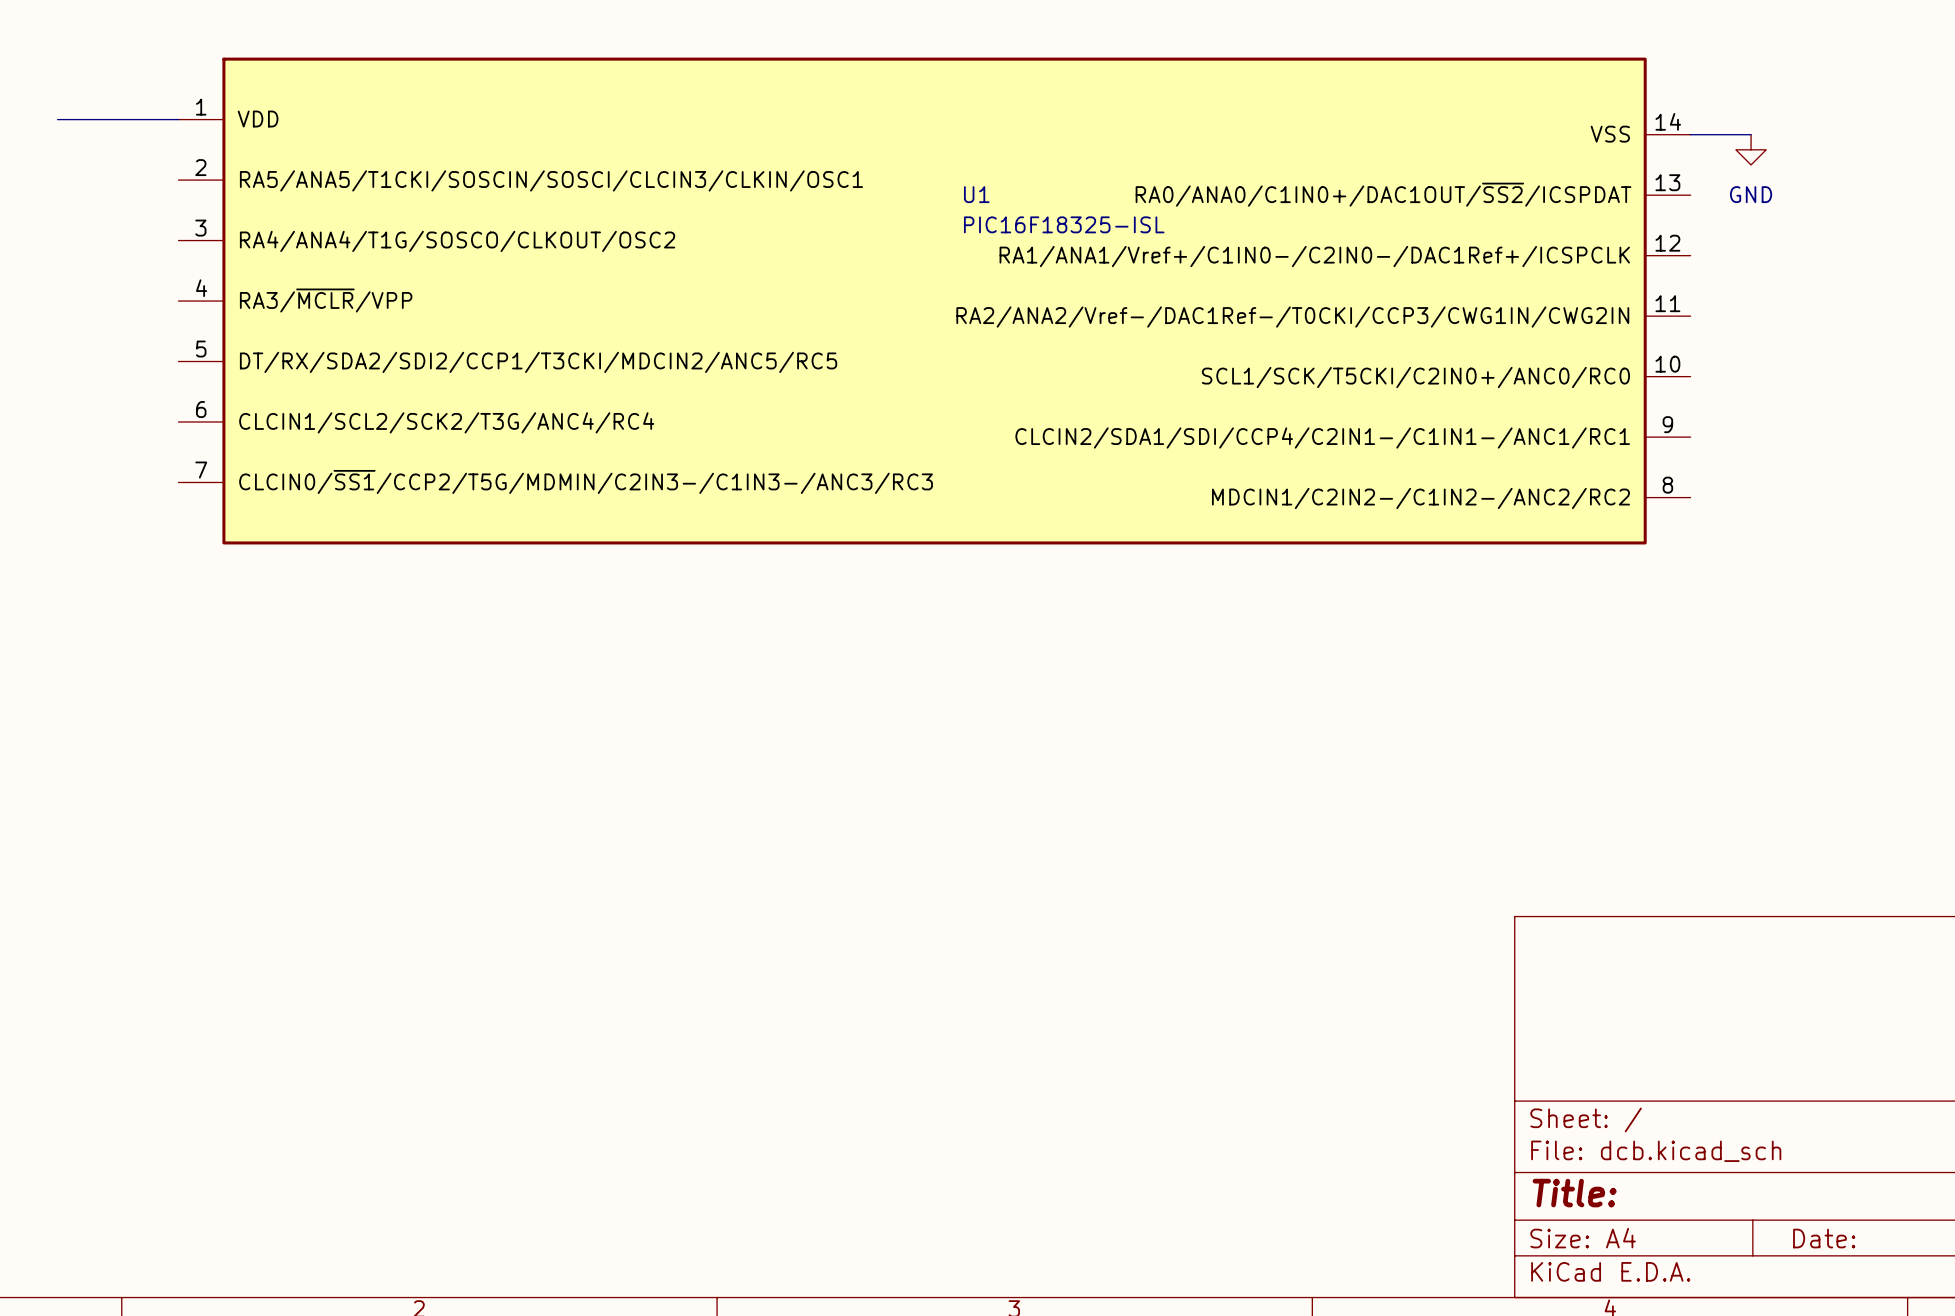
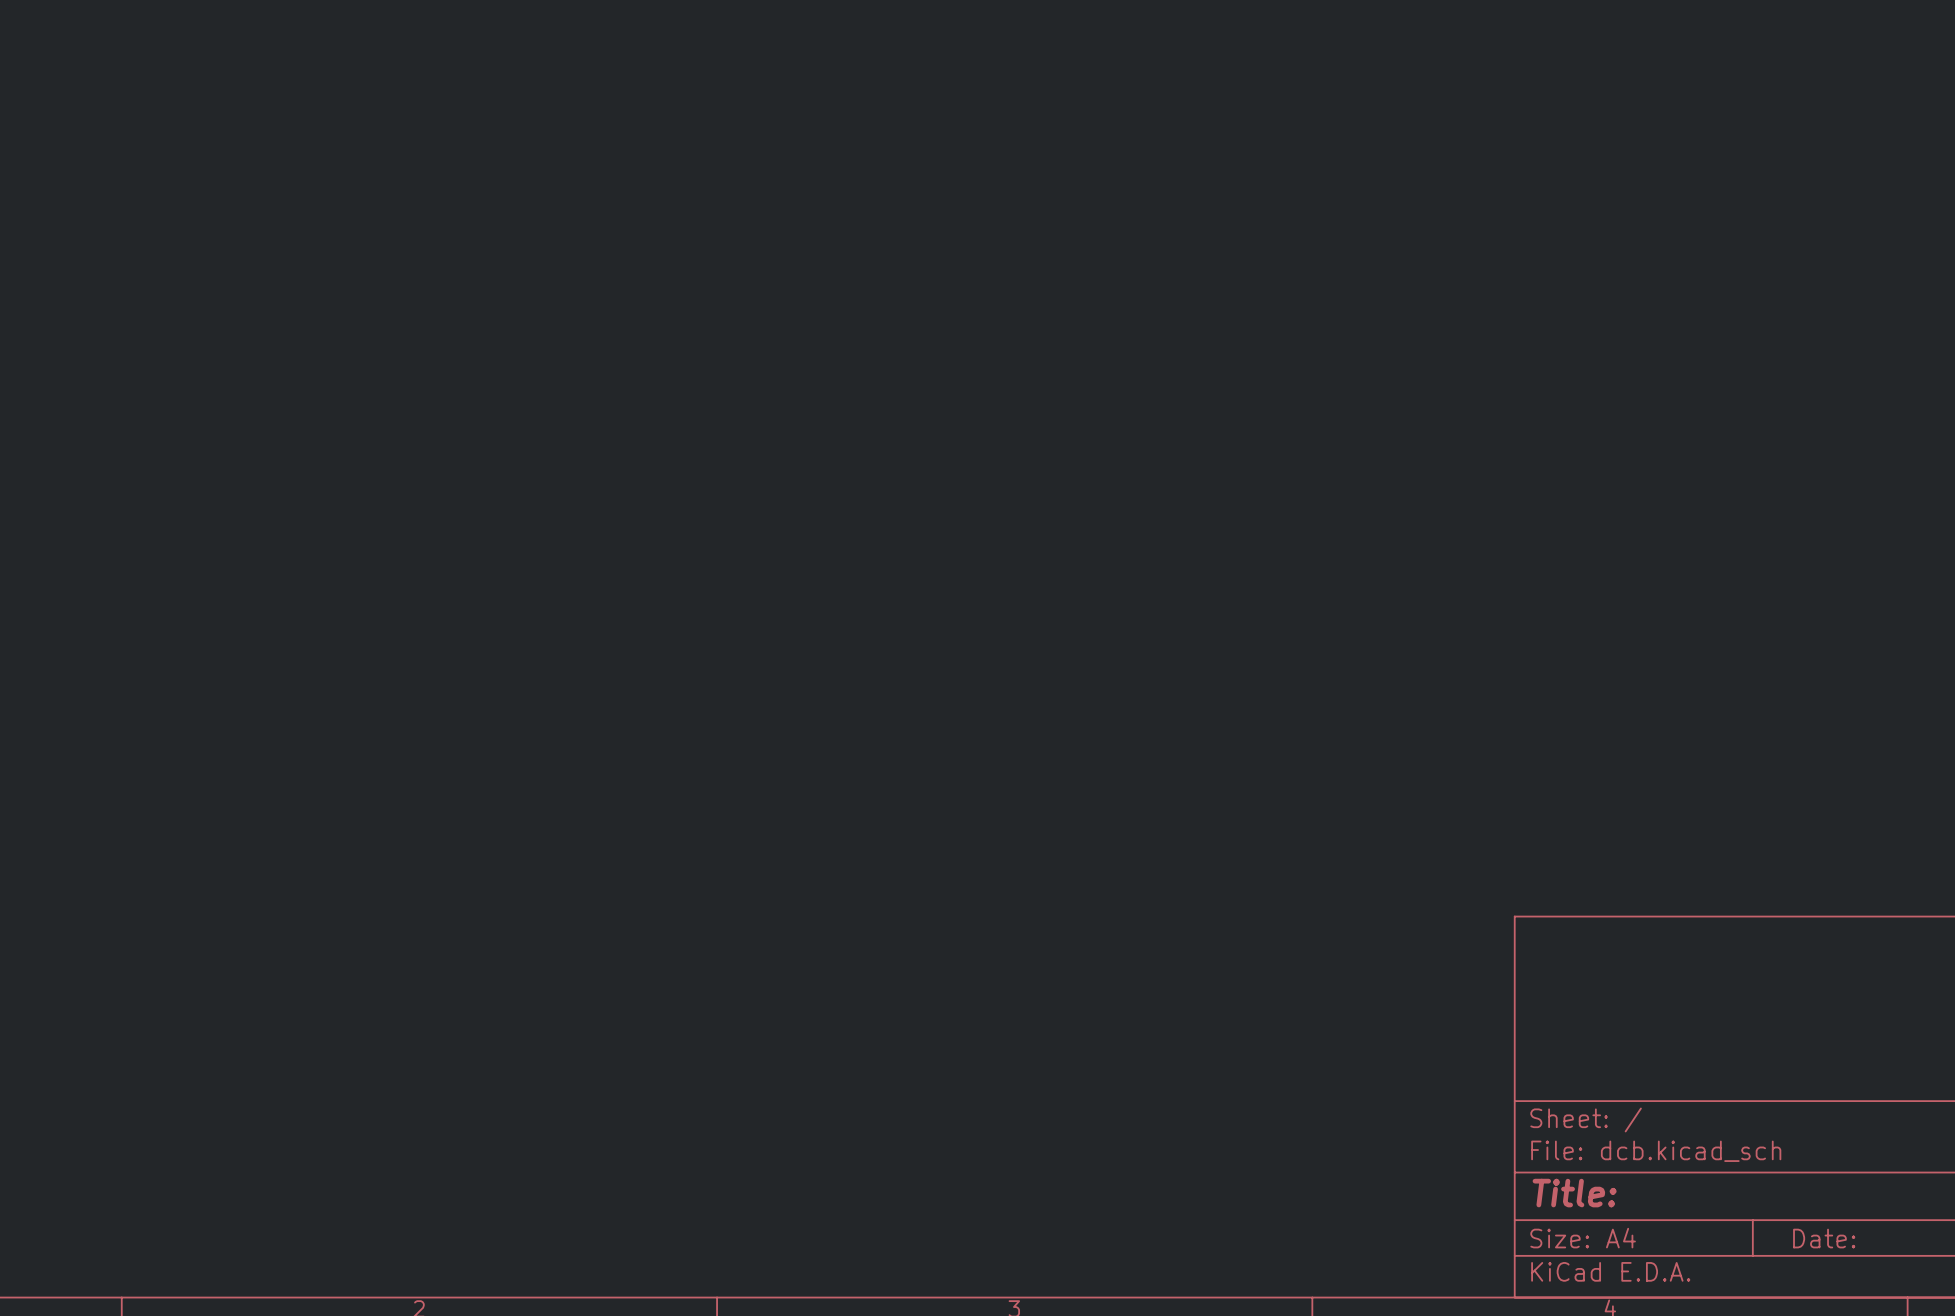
wire: (57, 119) (178, 119) -> none
wire: (1690, 134) (1751, 134) -> none
power symbol: GND (1751, 149) -> none
U1: PIC16F18325-ISL (934, 301) -> none

